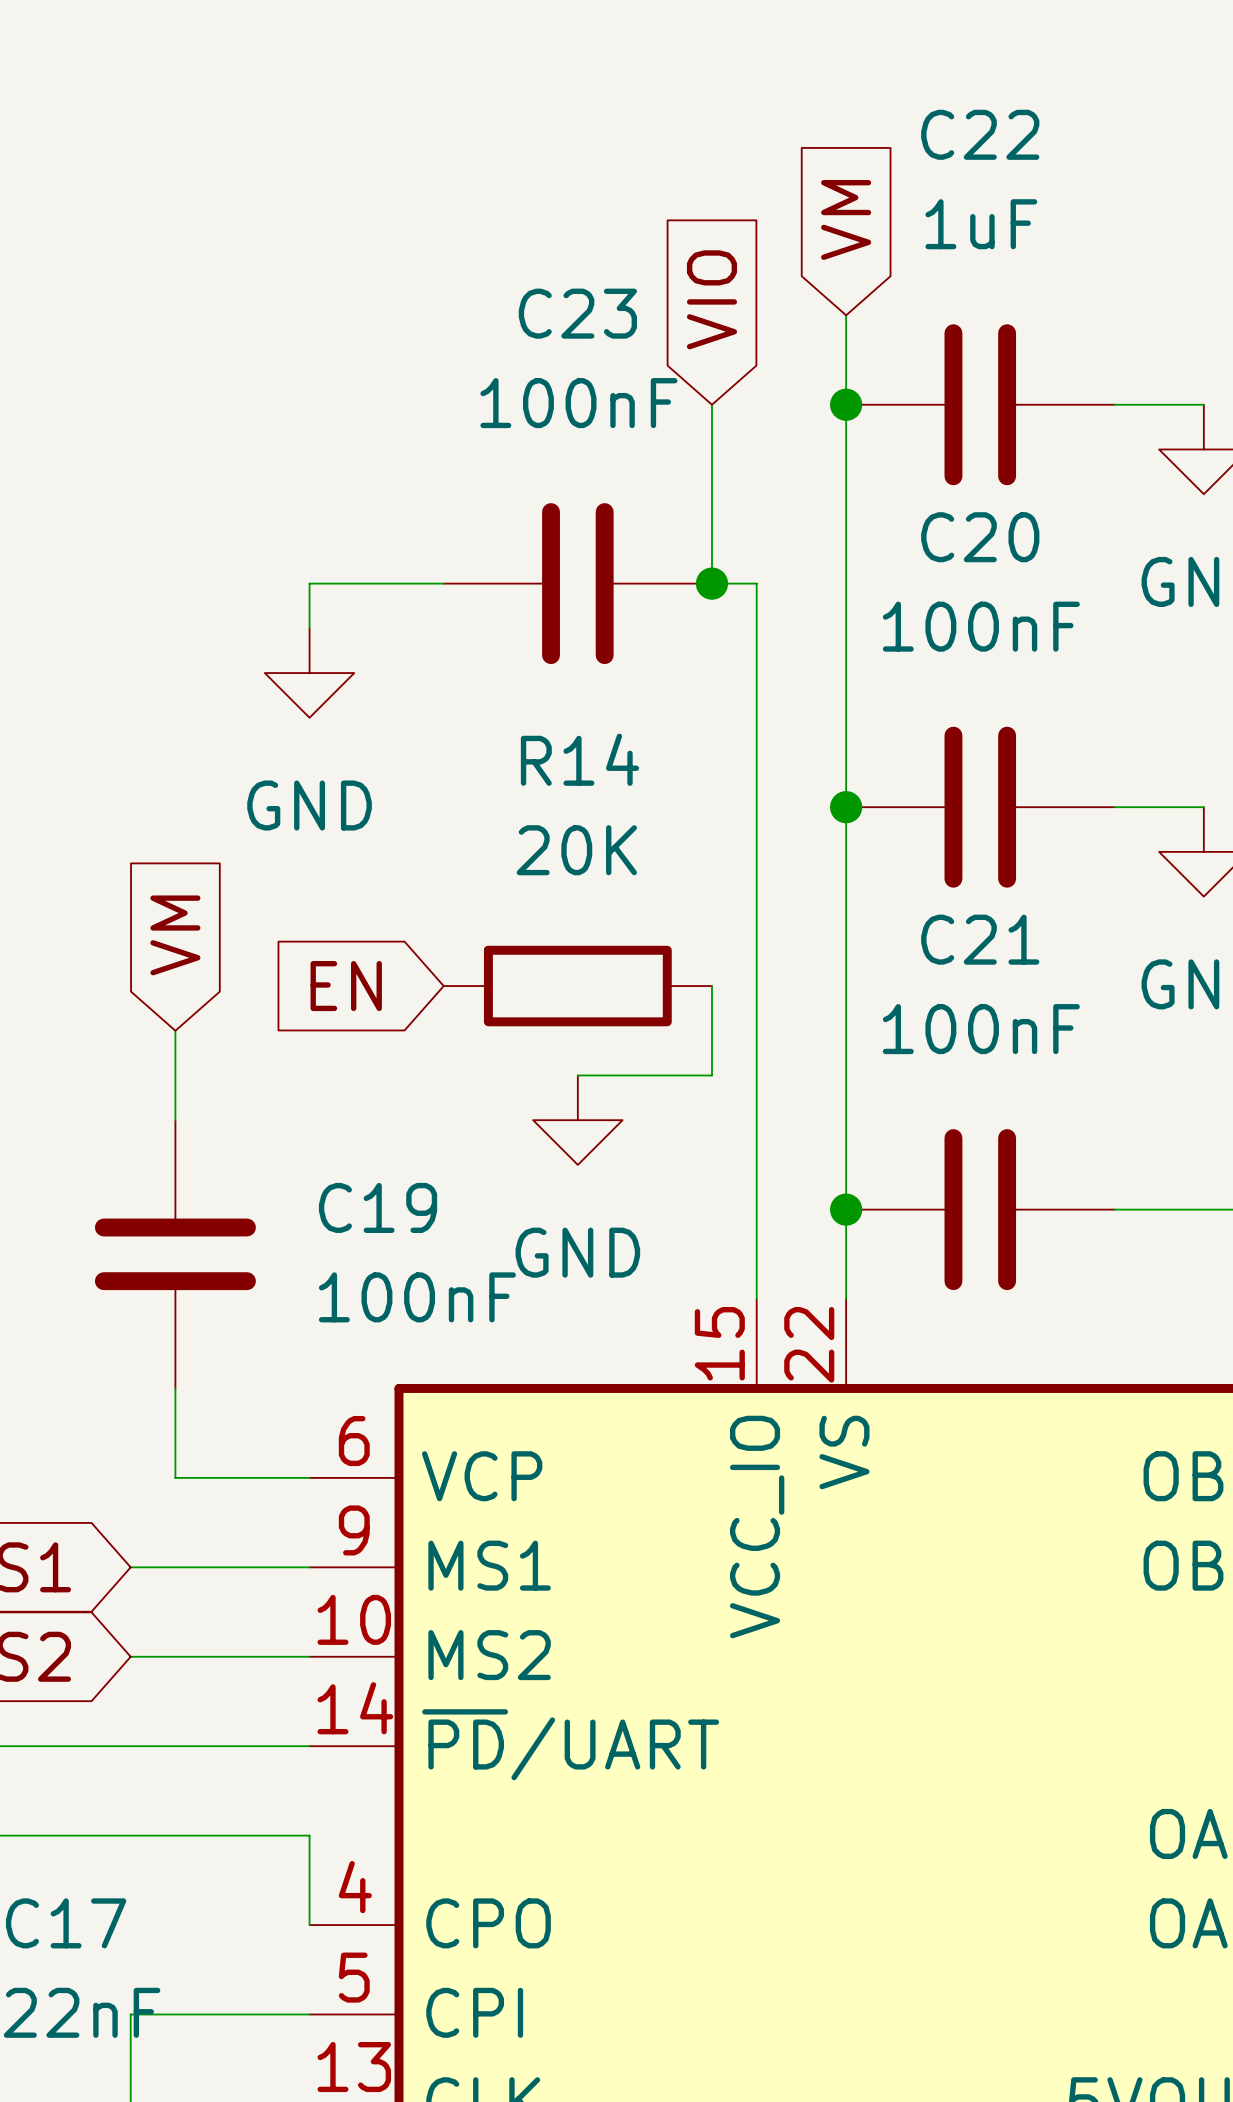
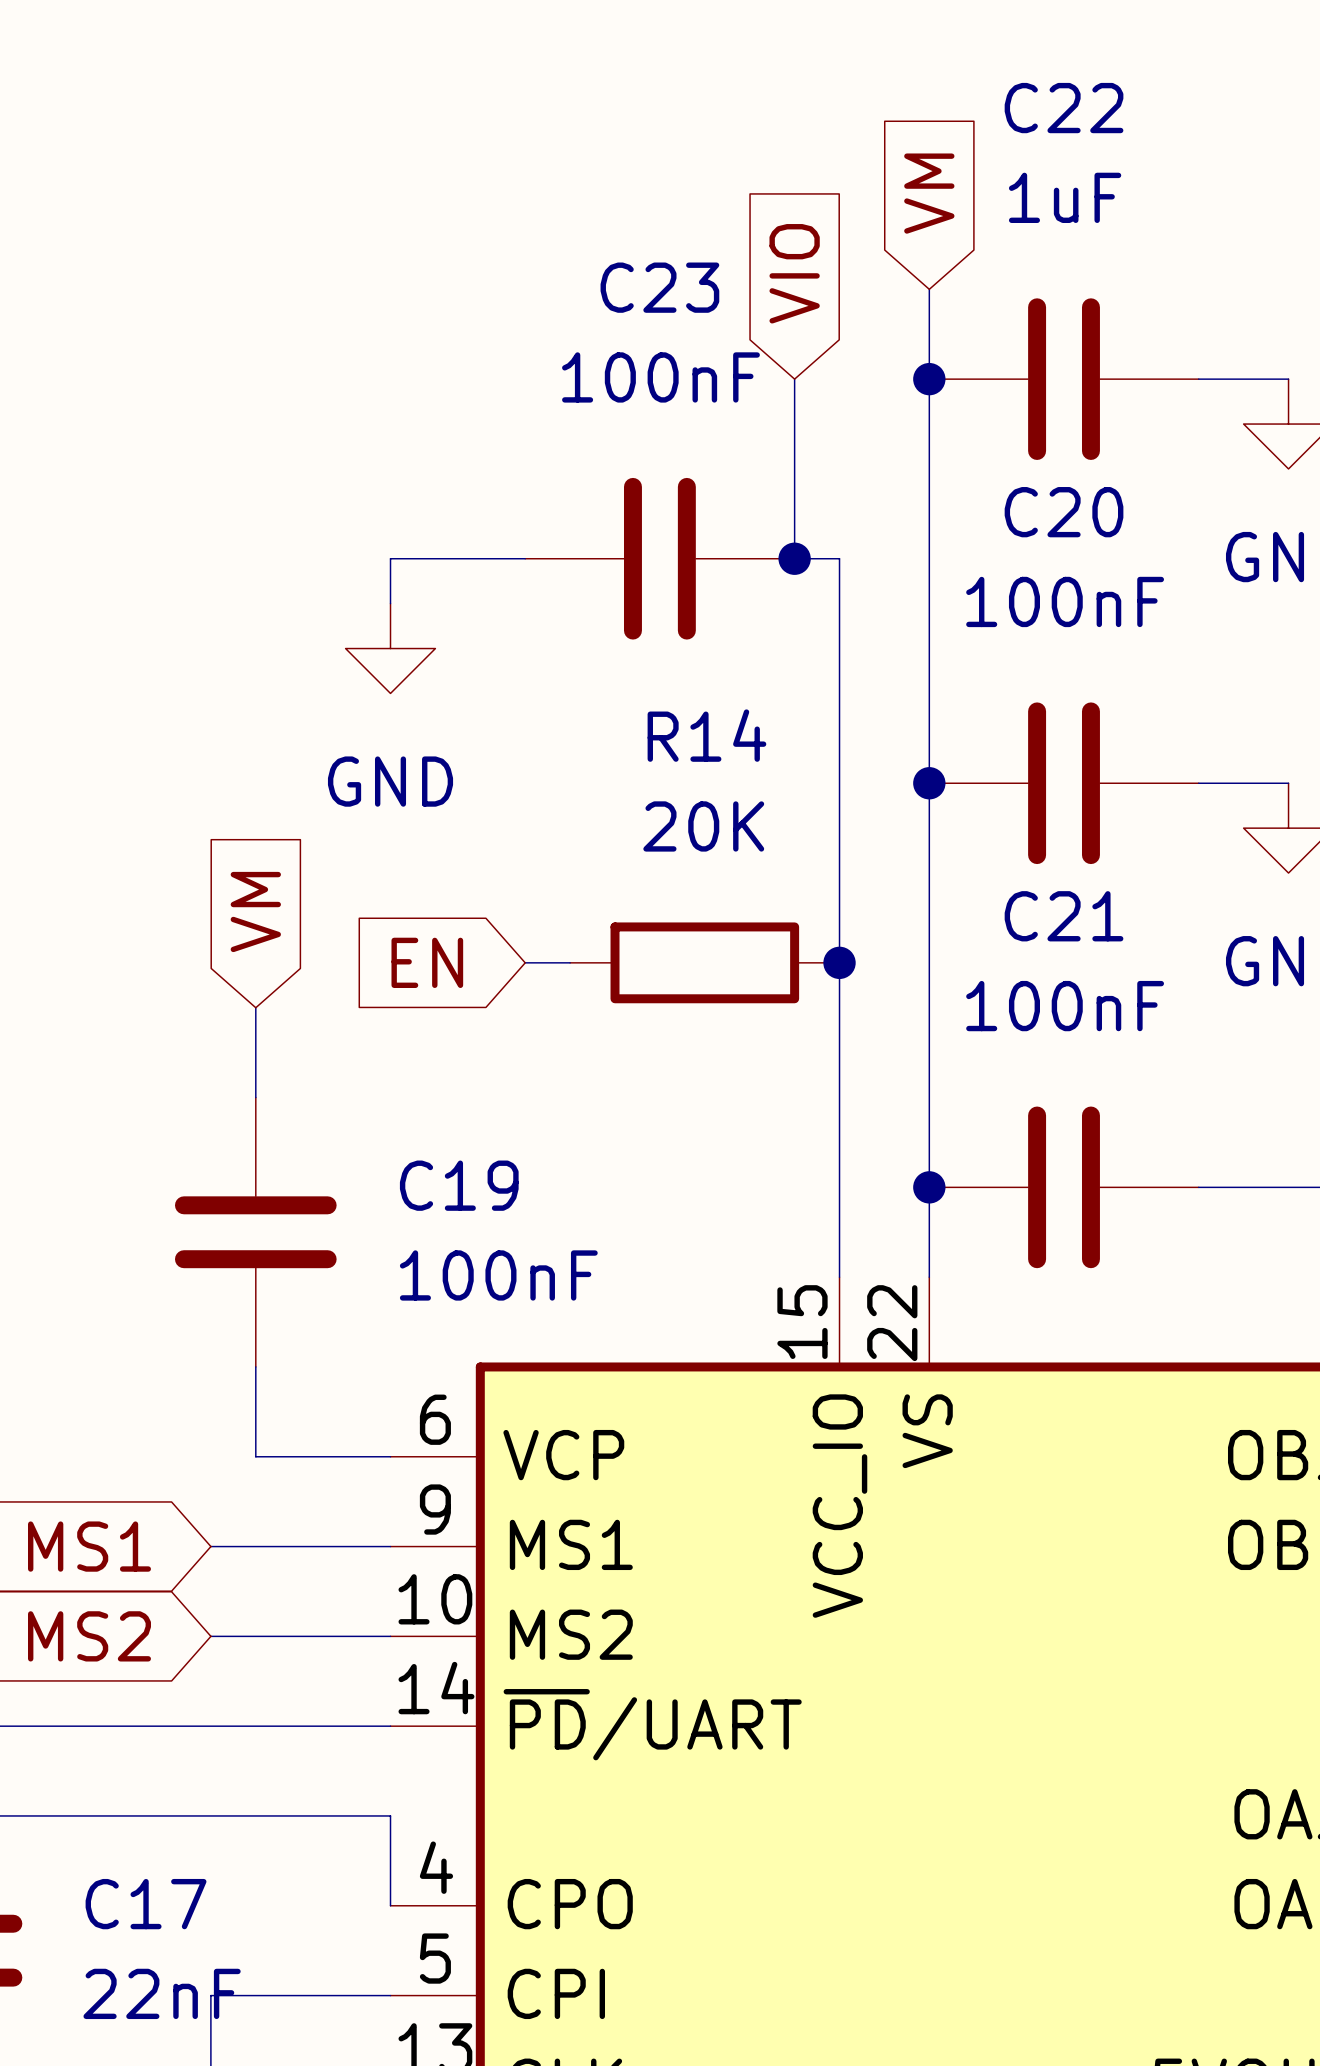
R14 position: (577, 986) -> (704, 962)
wire: (711, 986) (711, 1075) (577, 1075) -> none
junction: none -> (839, 962)
power symbol: GND (577, 1120) -> none

